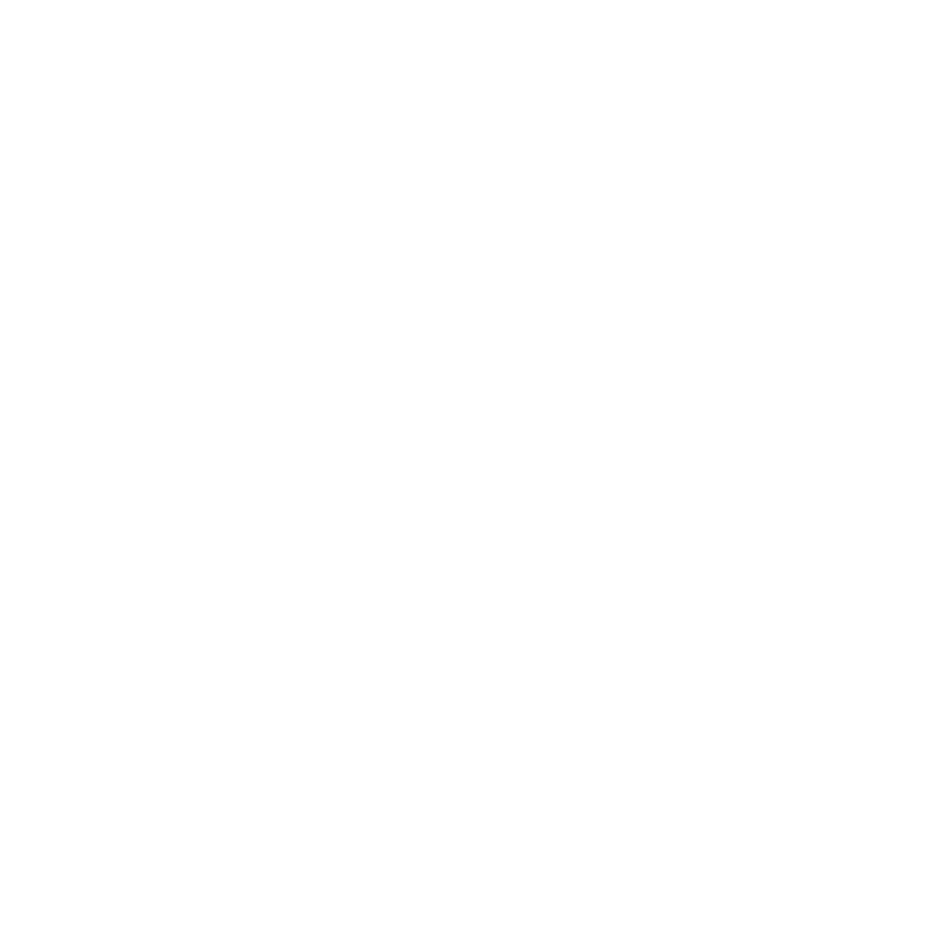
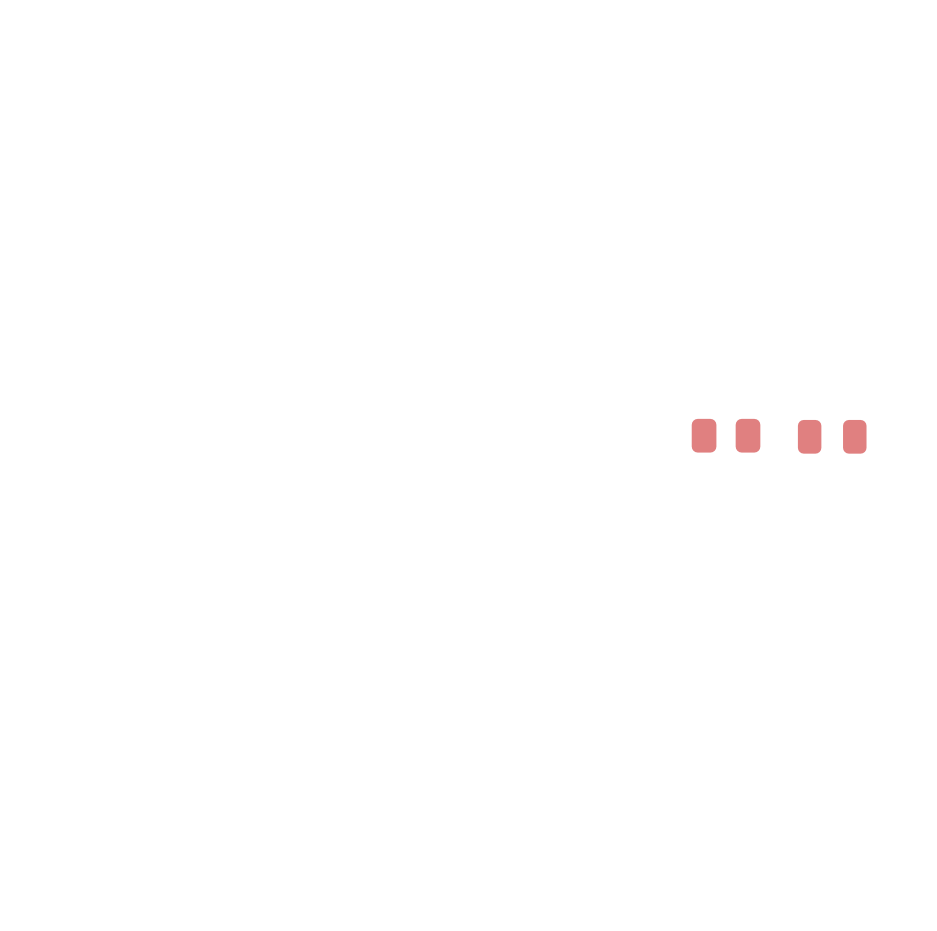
part: none -> (726, 435)
part: none -> (832, 436)

